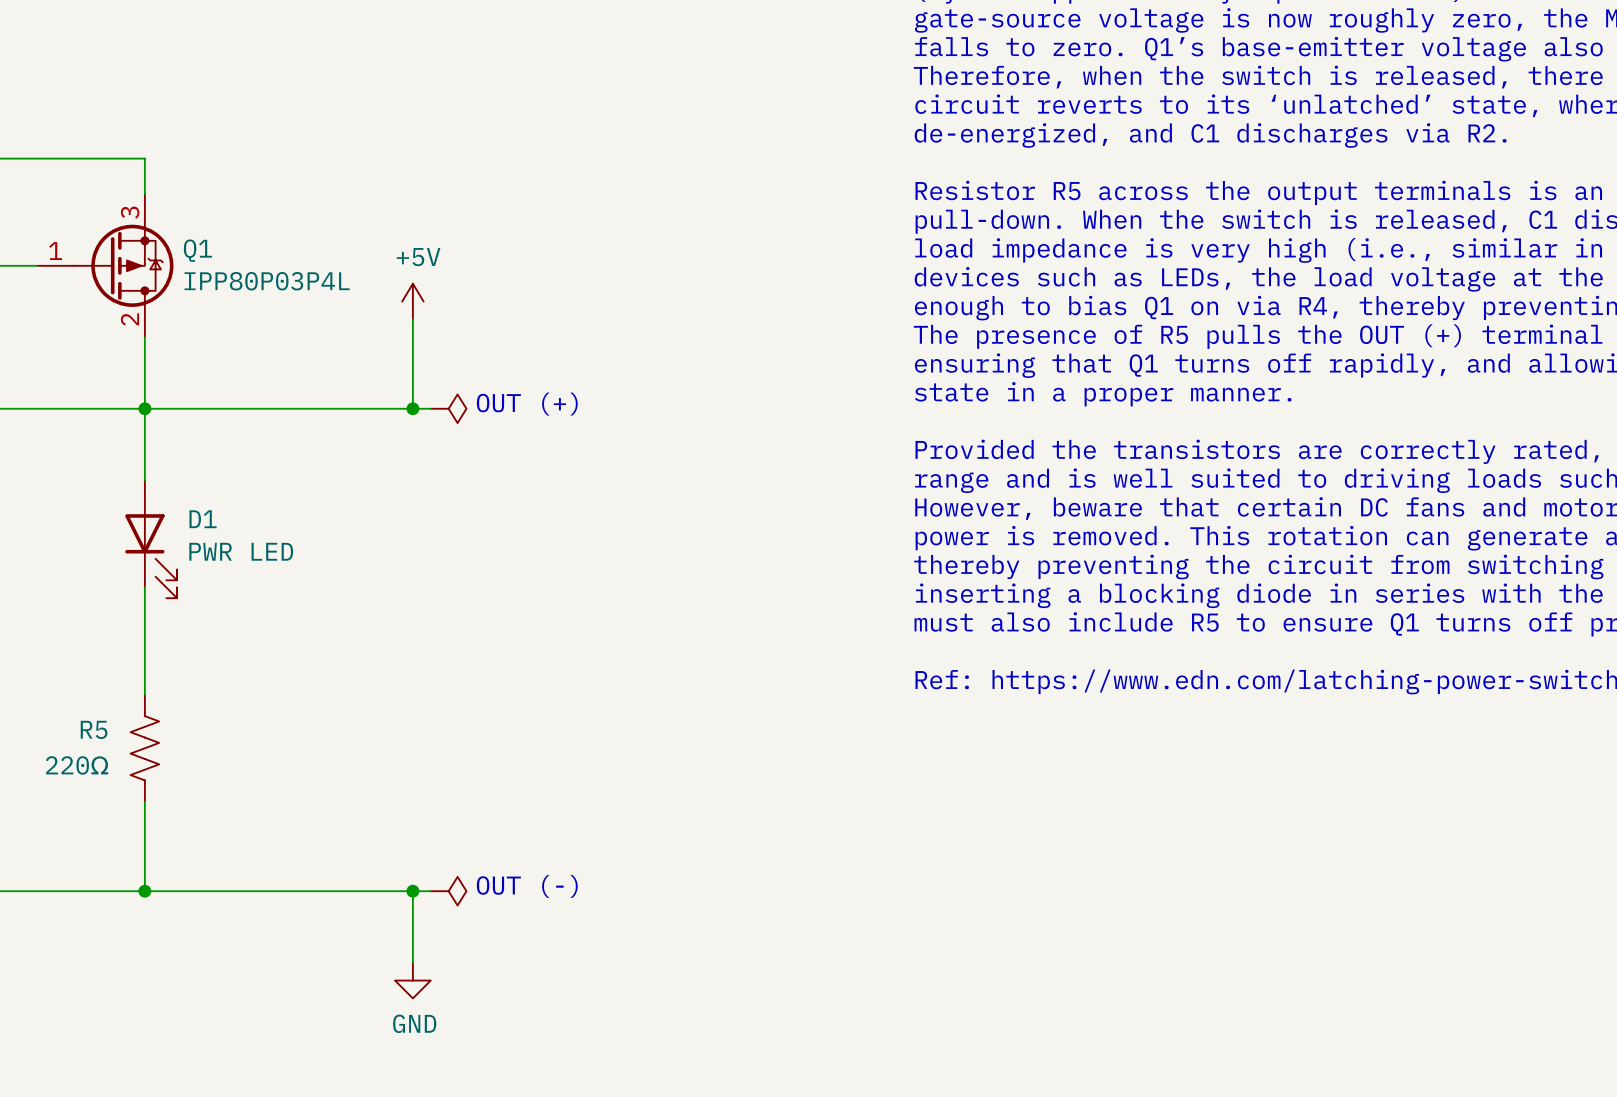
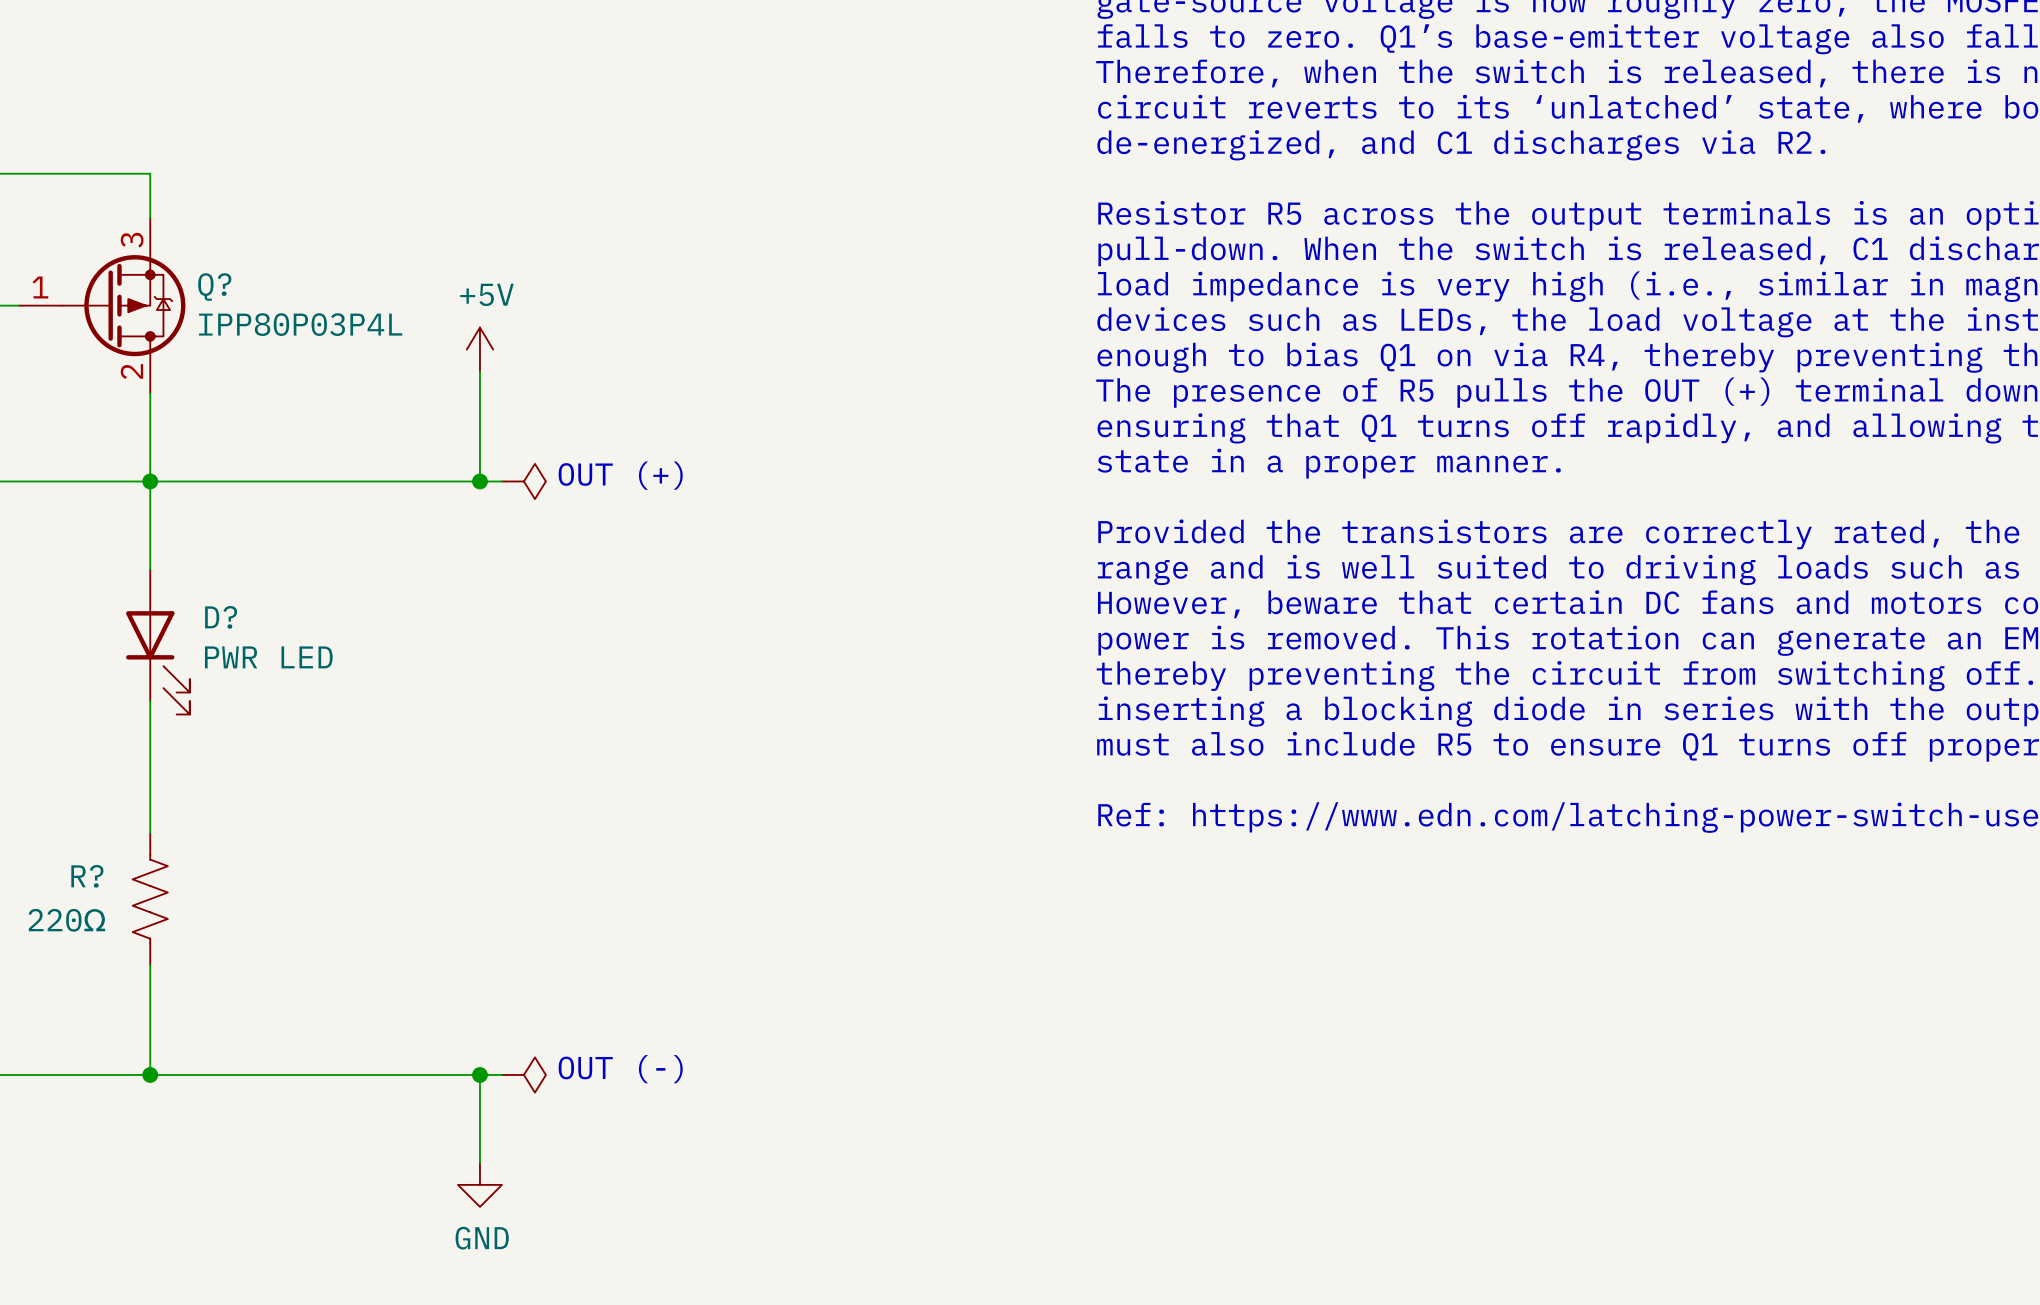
Q1 name: Q1 (197, 250) -> Q? (214, 286)
D1 name: D1 (203, 519) -> D? (221, 617)
R5 name: R5 (94, 729) -> R? (87, 876)

